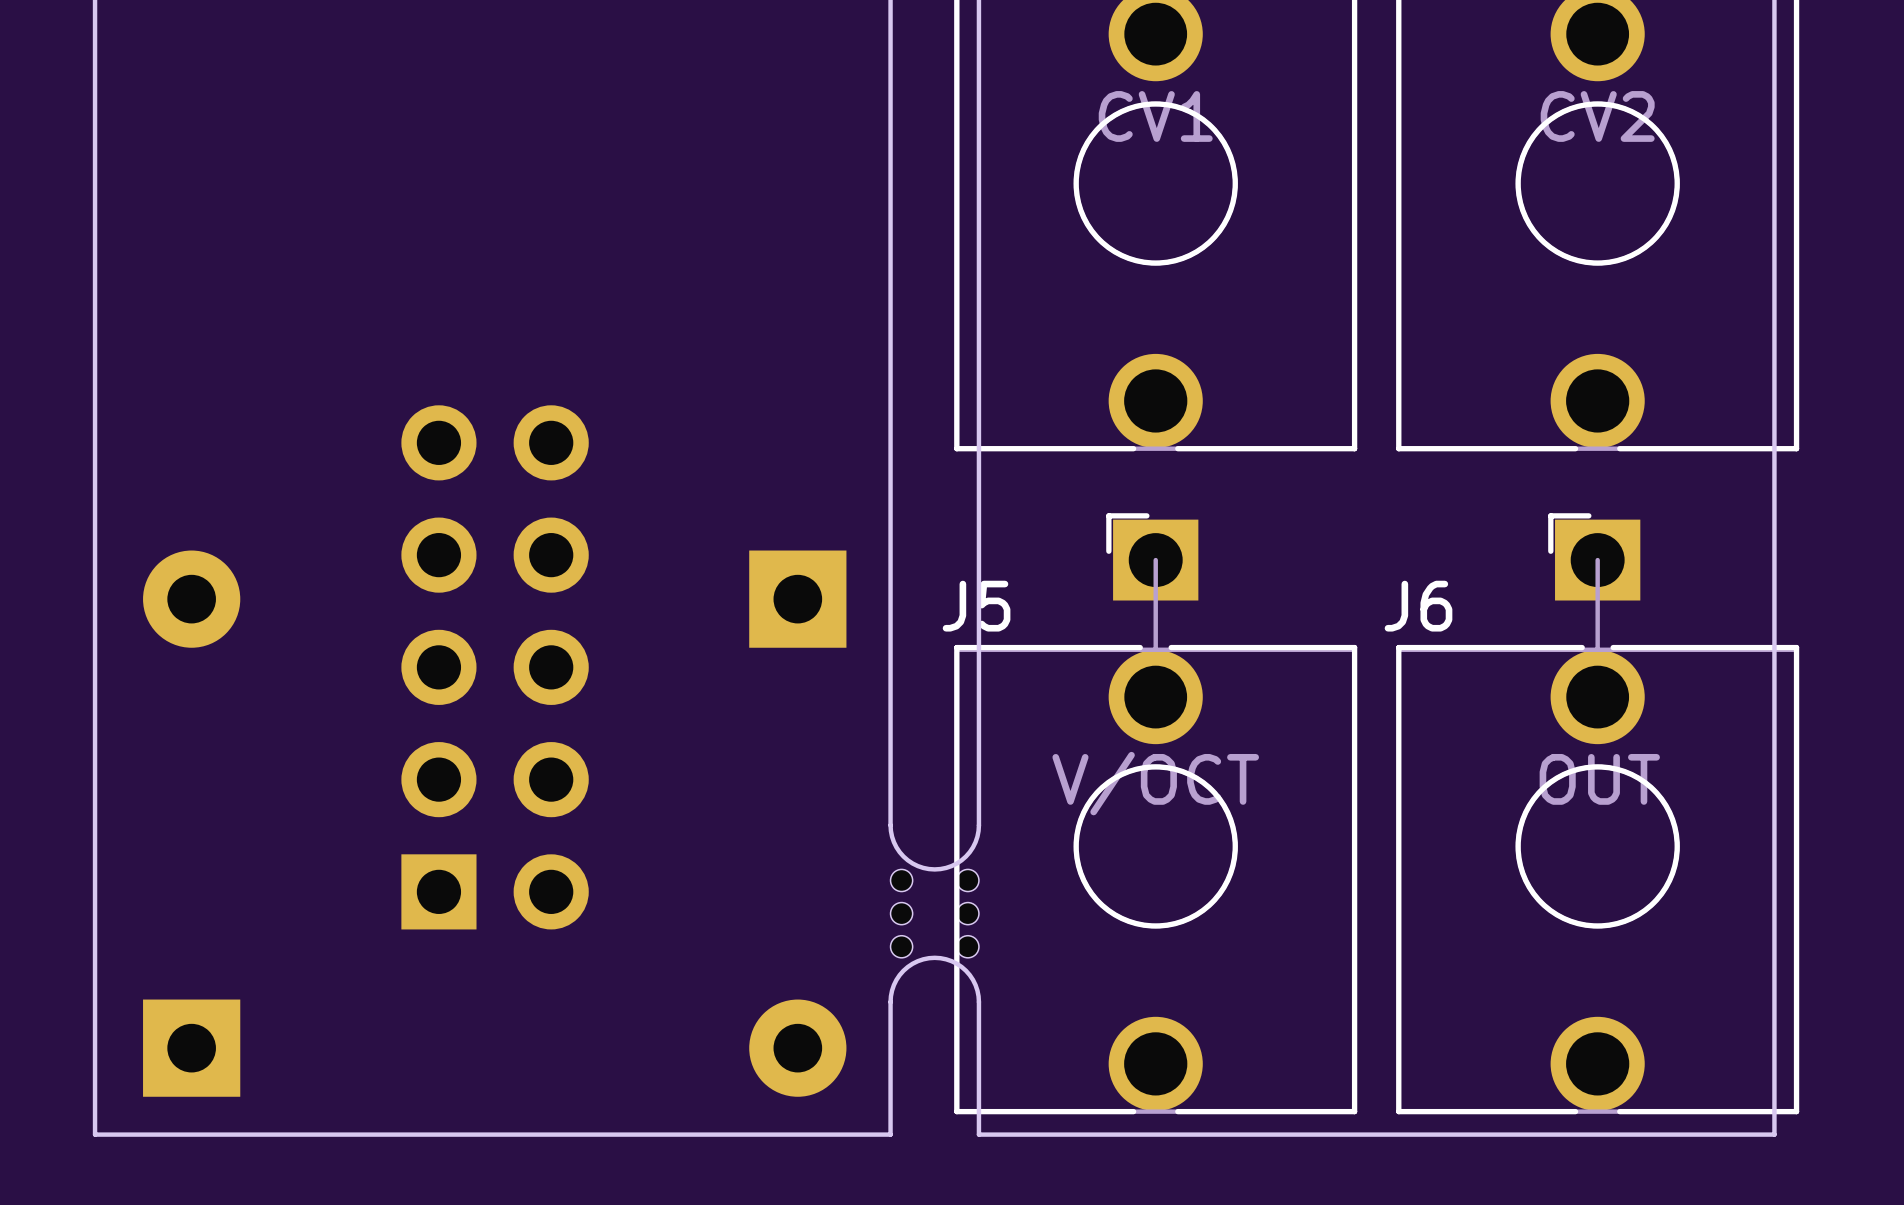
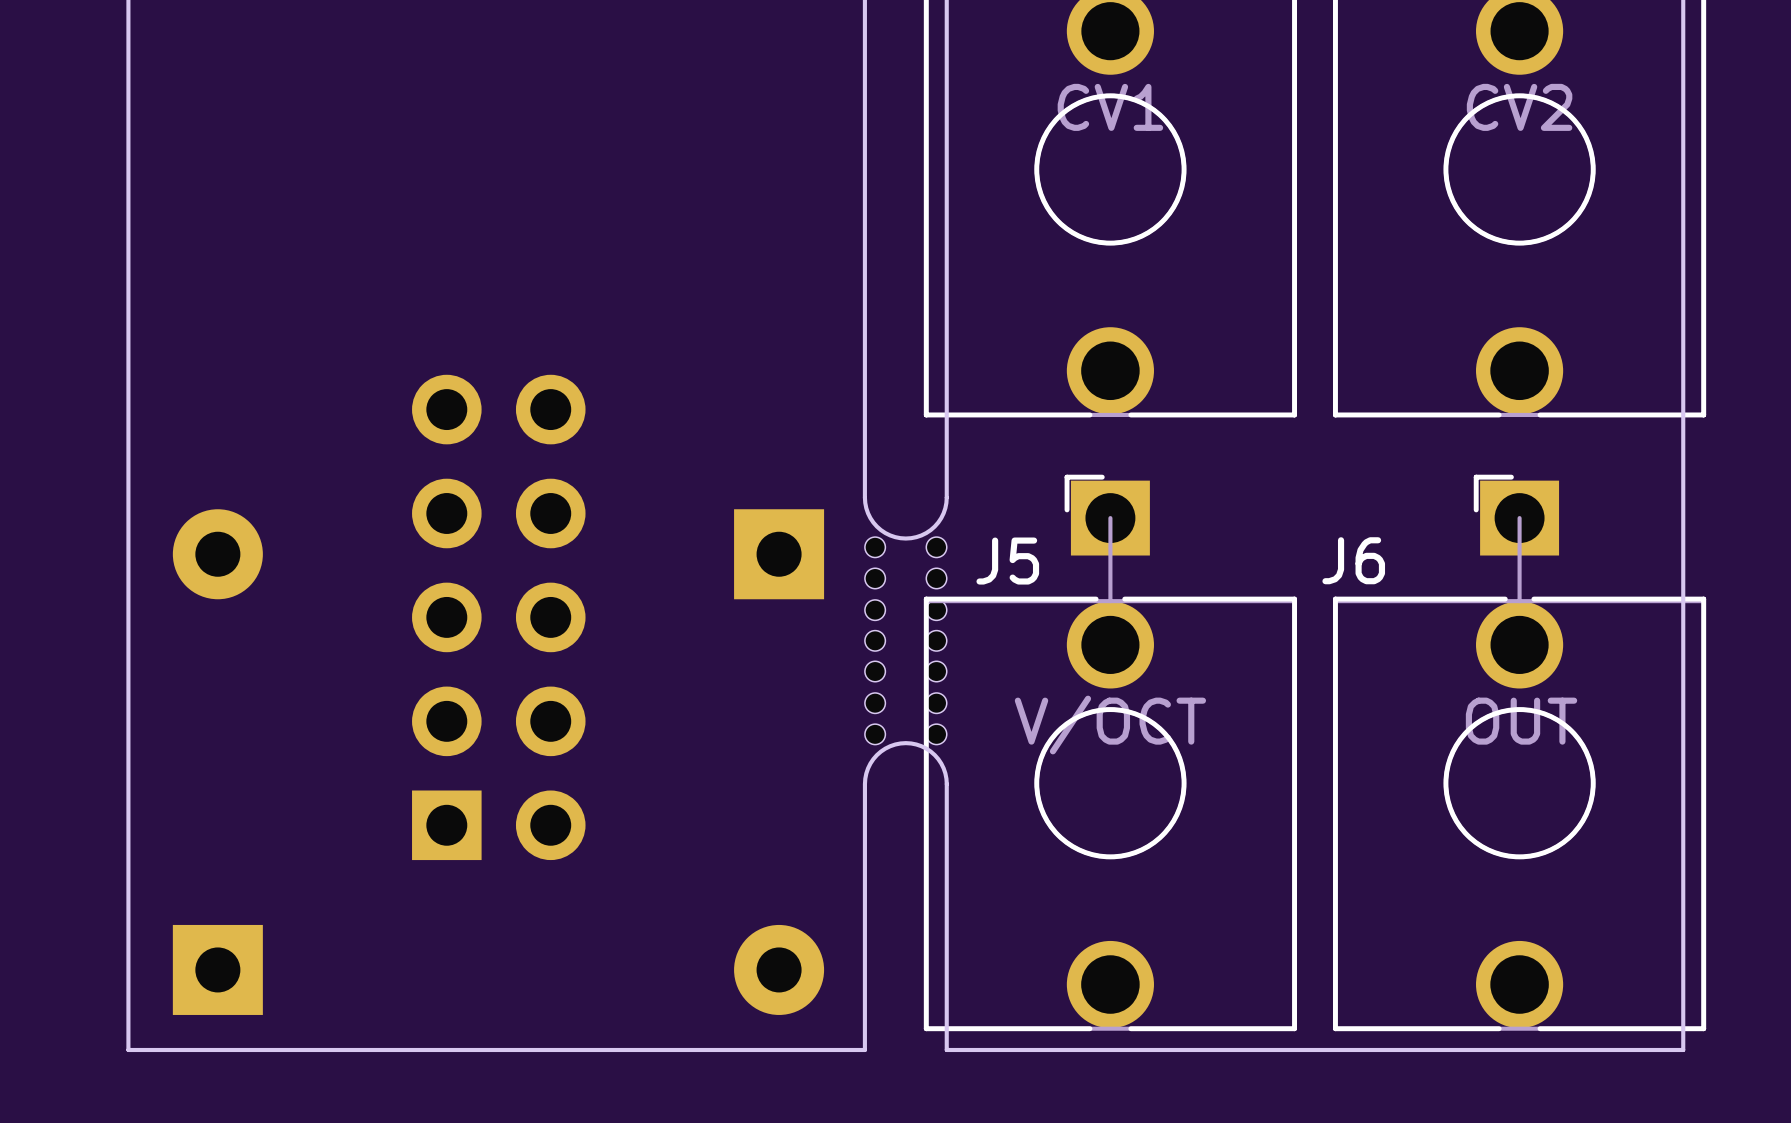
board edge: (978, 537) (978, 831) (973, 847) (961, 860) (946, 867) (934, 869) (923, 867) (907, 860) (896, 847) (890, 831) (890, 537) -> (946, 497) (943, 513) (934, 526) (921, 535) (905, 538) (890, 535) (876, 526) (868, 513) (864, 497)
J5 name position: J5 (976, 606) -> J5 (1007, 561)
part: none -> (905, 640)
part: (934, 913) -> none
board edge: (978, 1134) (977, 990) (969, 975) (961, 966) (946, 959) (934, 957) (923, 959) (907, 966) (899, 975) (892, 990) (890, 1134) -> (946, 1049) (946, 778) (941, 763) (930, 751) (921, 746) (905, 743) (890, 746) (880, 751) (870, 763) (865, 778) (864, 1049)

